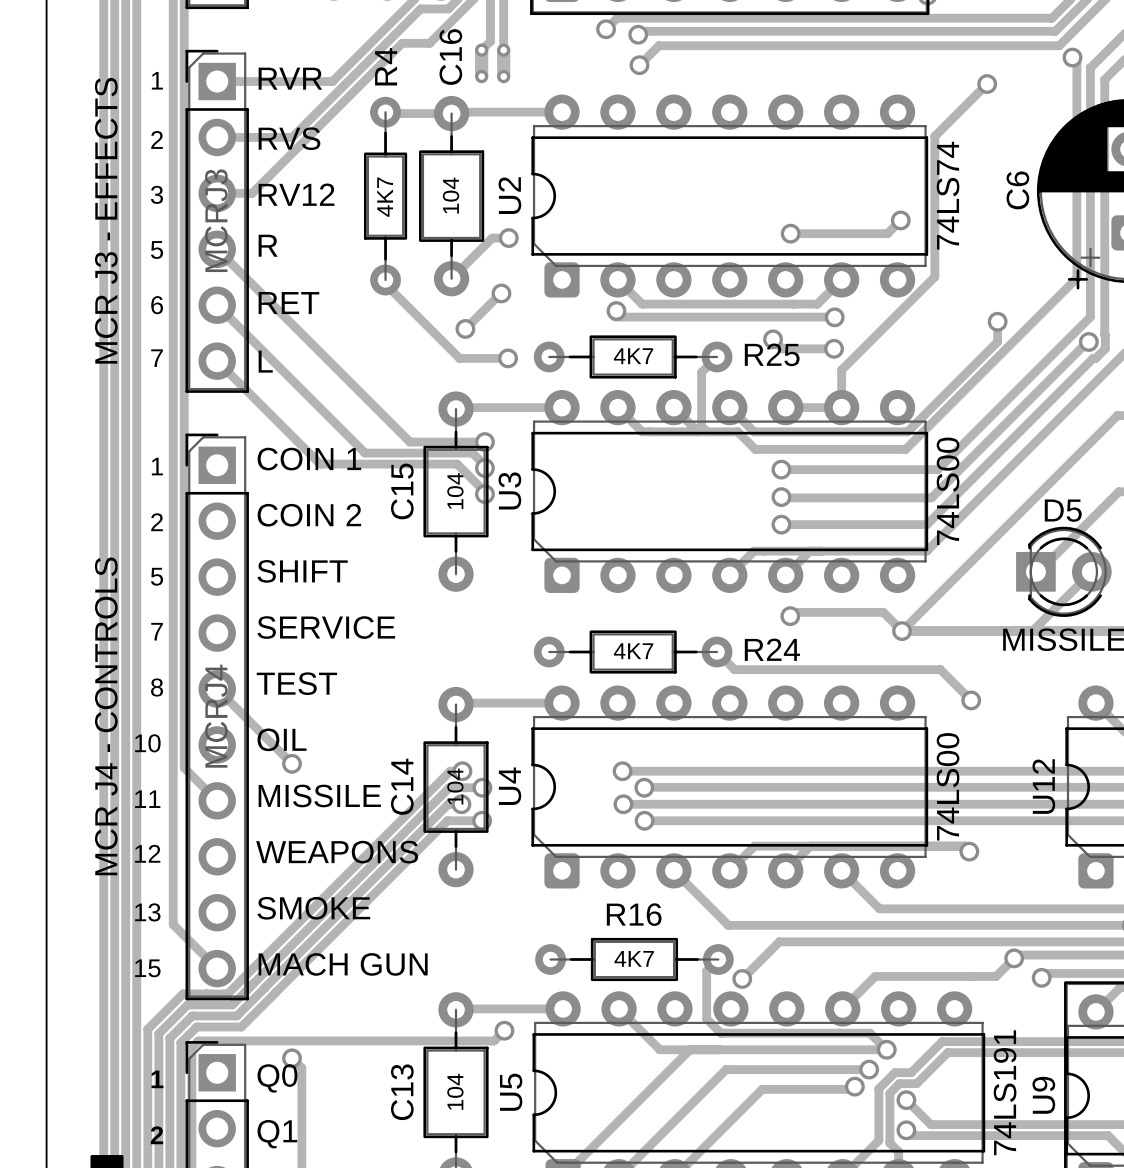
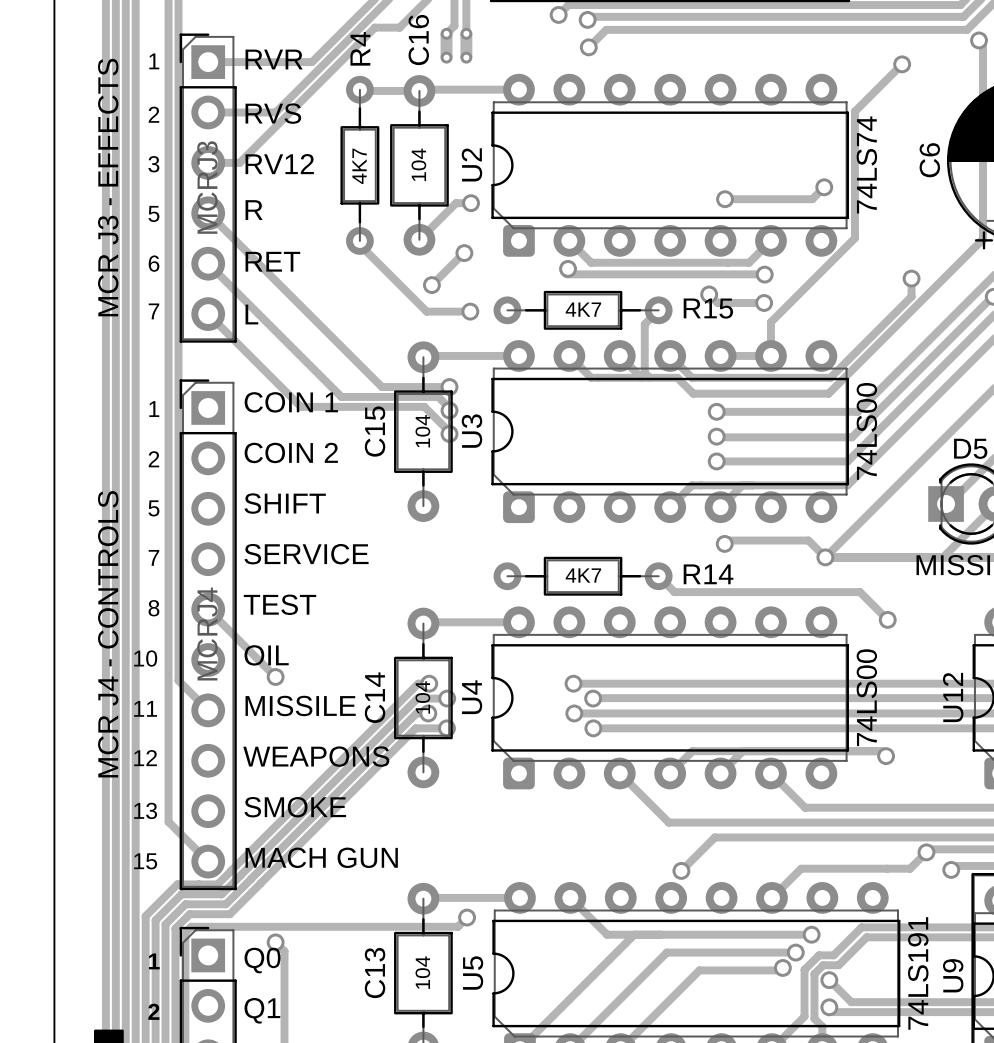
R25 name: R25 (772, 354) -> R15 (708, 308)
R24 name: R24 (772, 649) -> R14 (708, 574)
R16: 4K7 (634, 959) -> none
track: (718, 959) (706, 971) (706, 1018) (720, 1033) (869, 1033) (886, 1049) -> none

